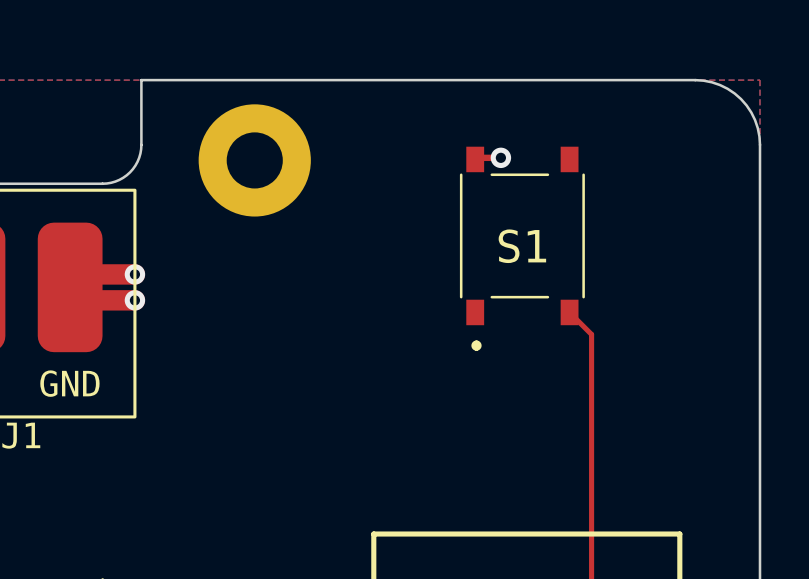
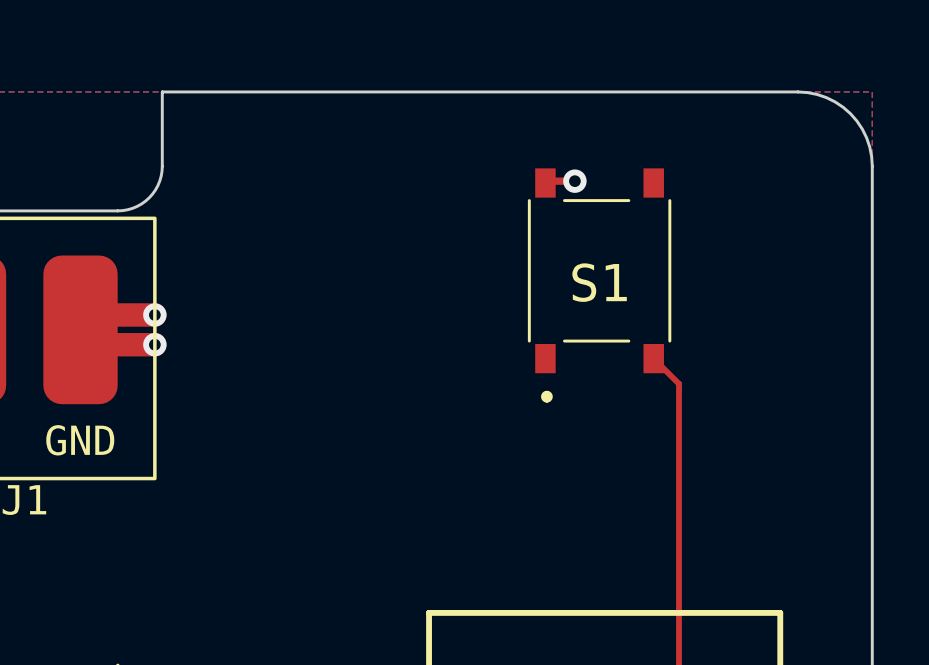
part: (254, 160) -> none

